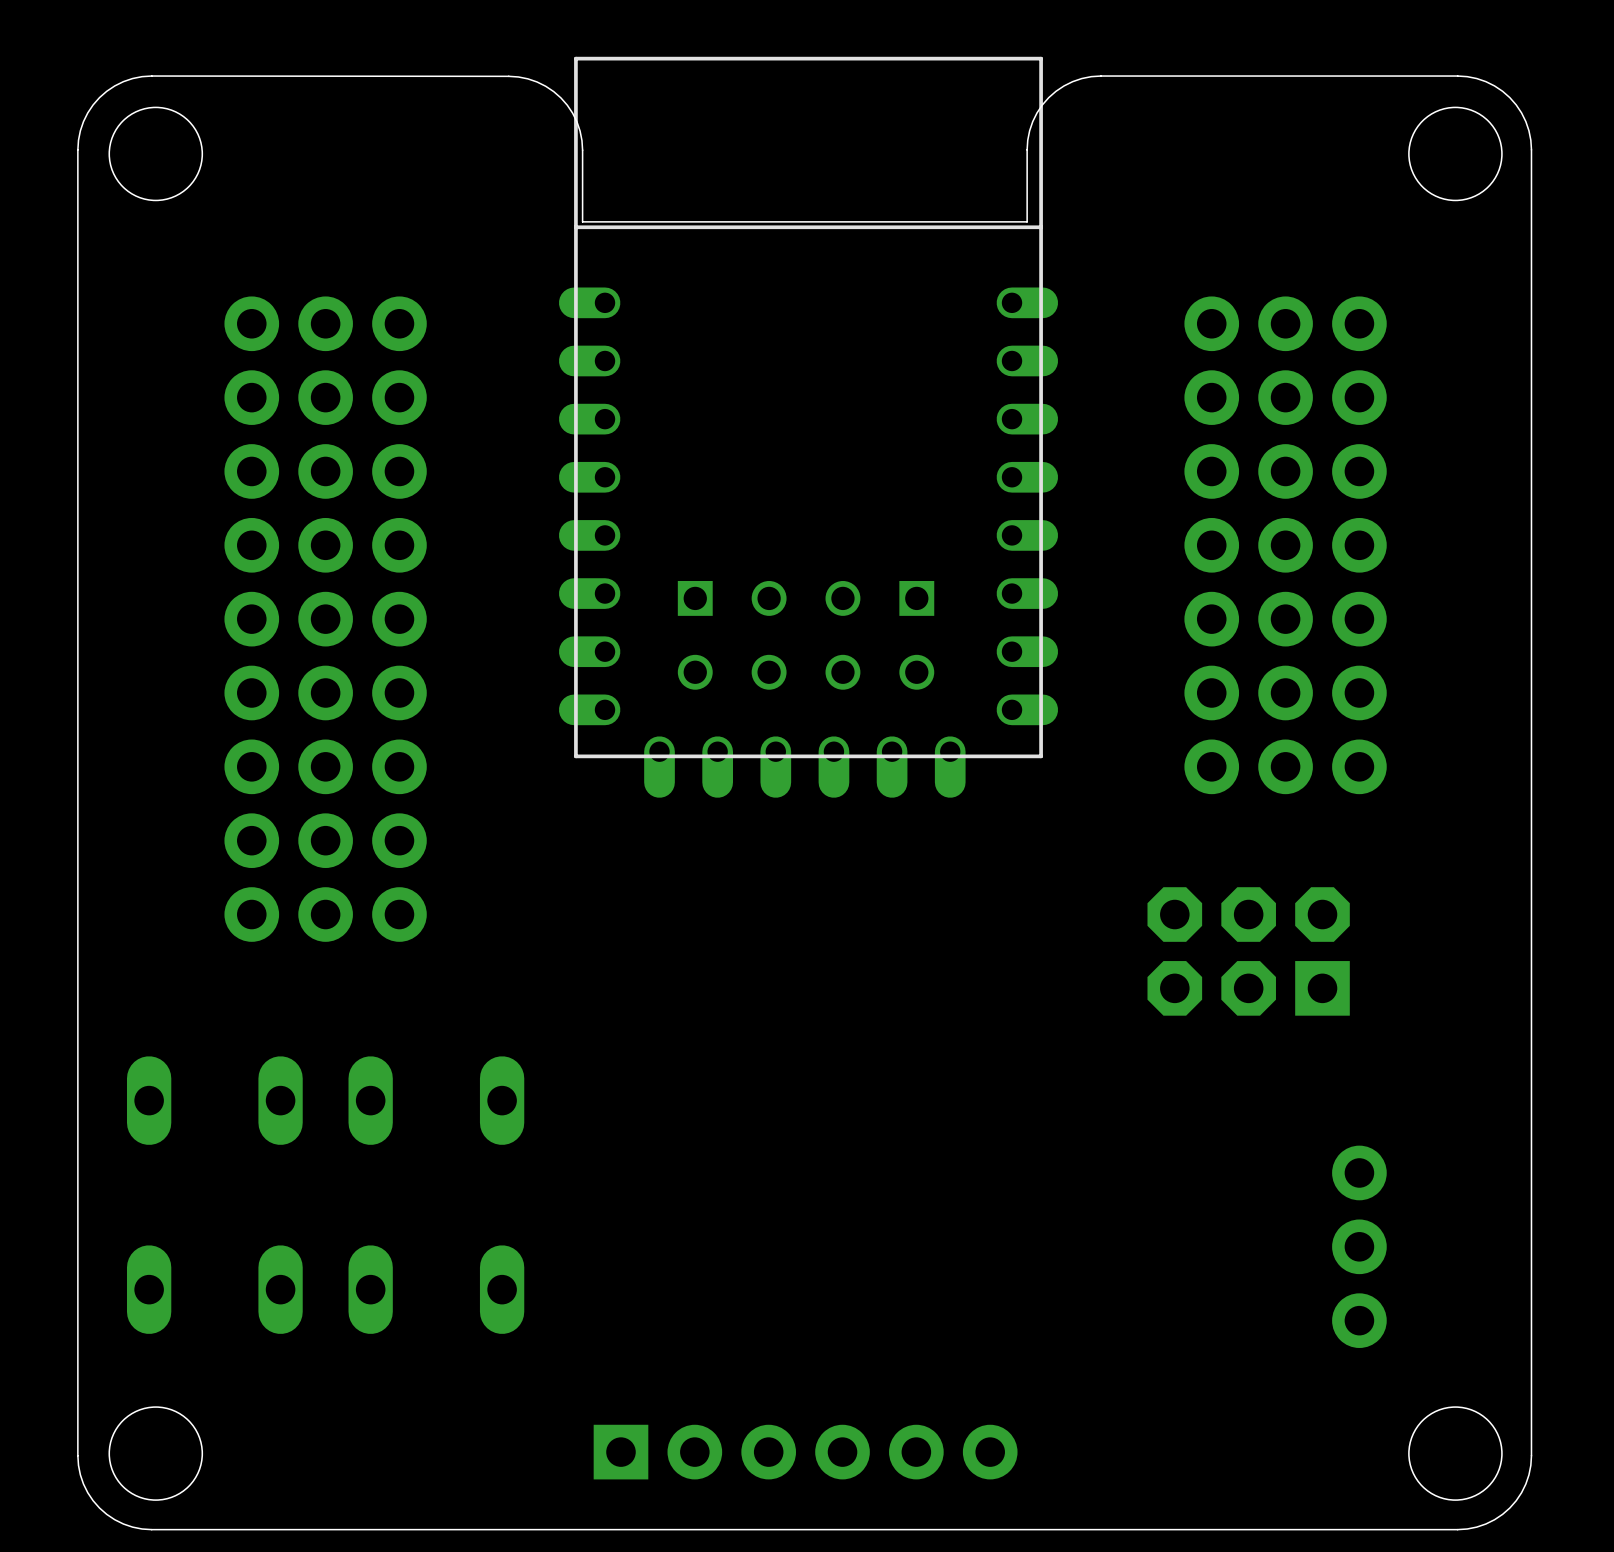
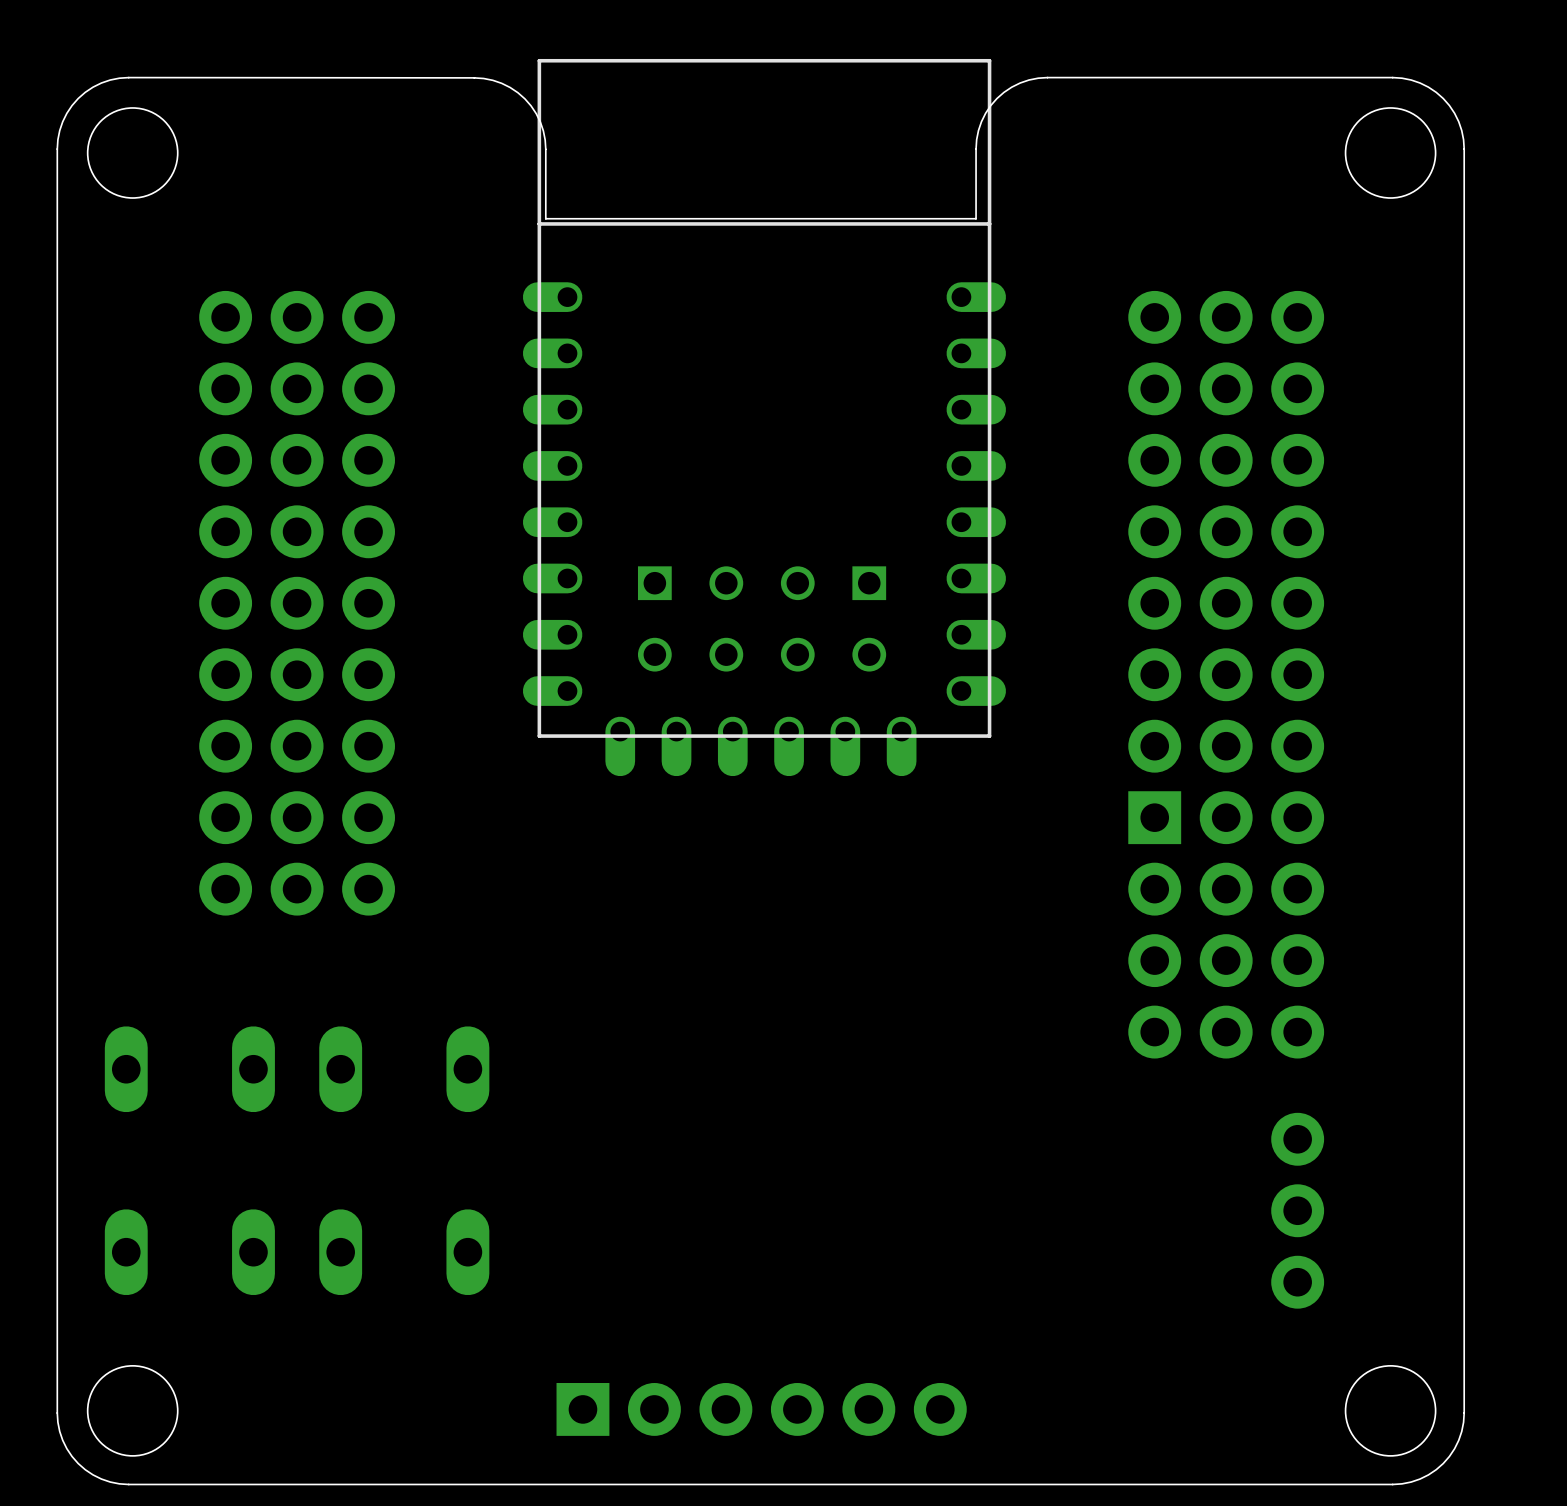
part: none -> (1226, 674)
part: none -> (1297, 674)
part: none -> (1154, 924)
part: (1248, 951) -> none

